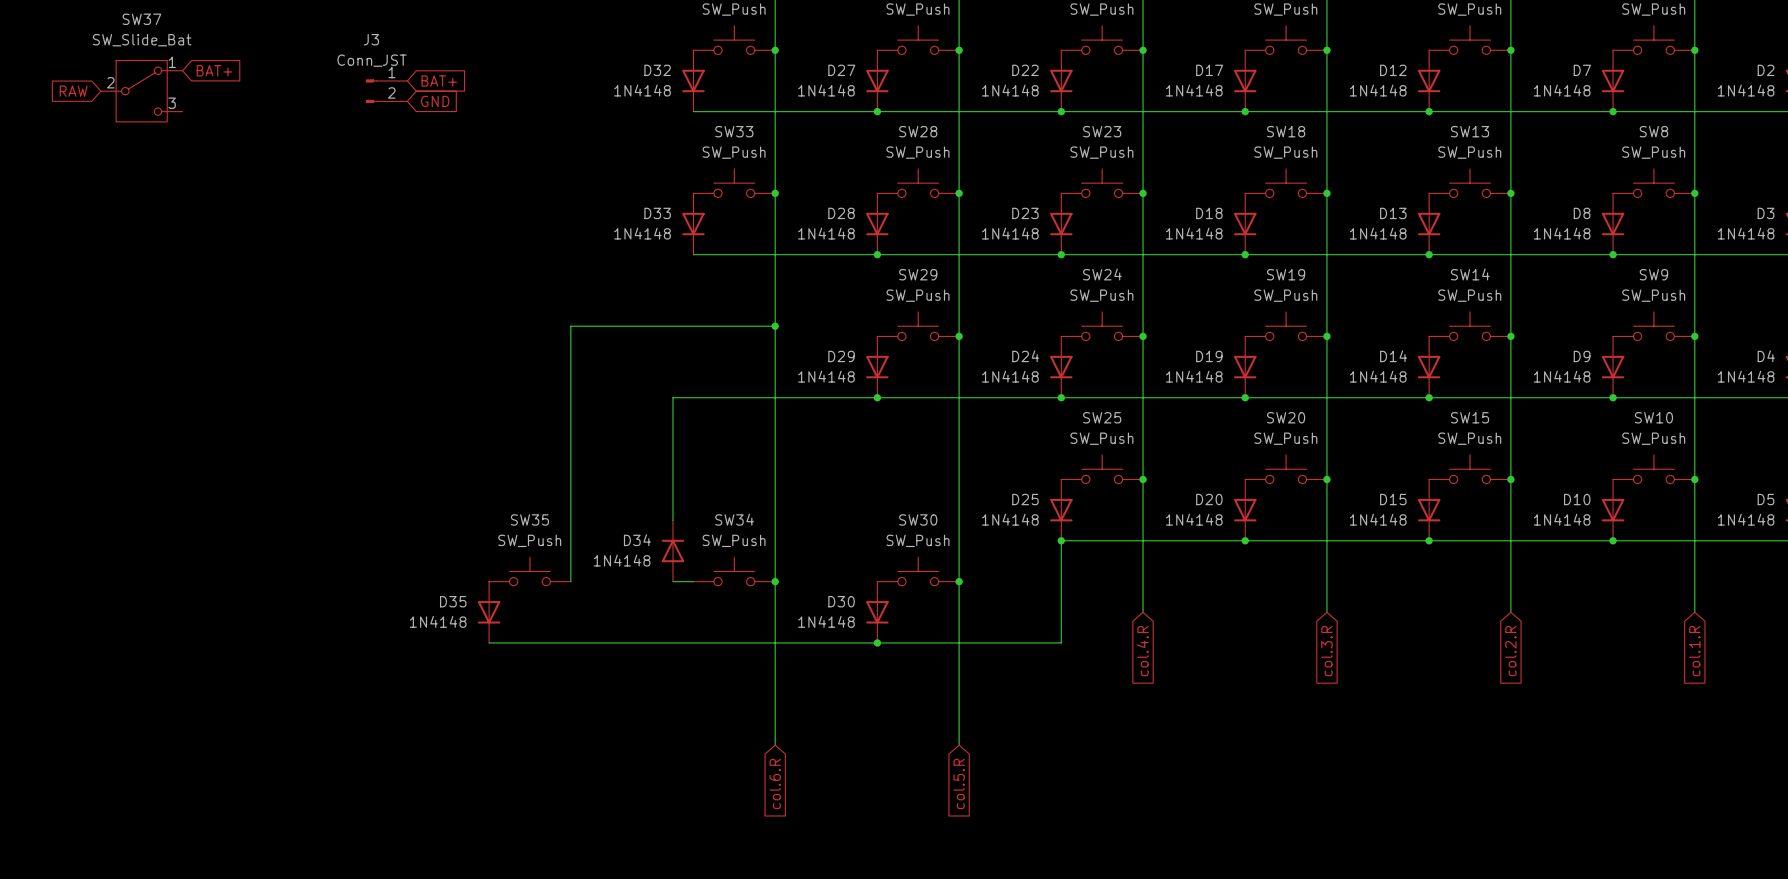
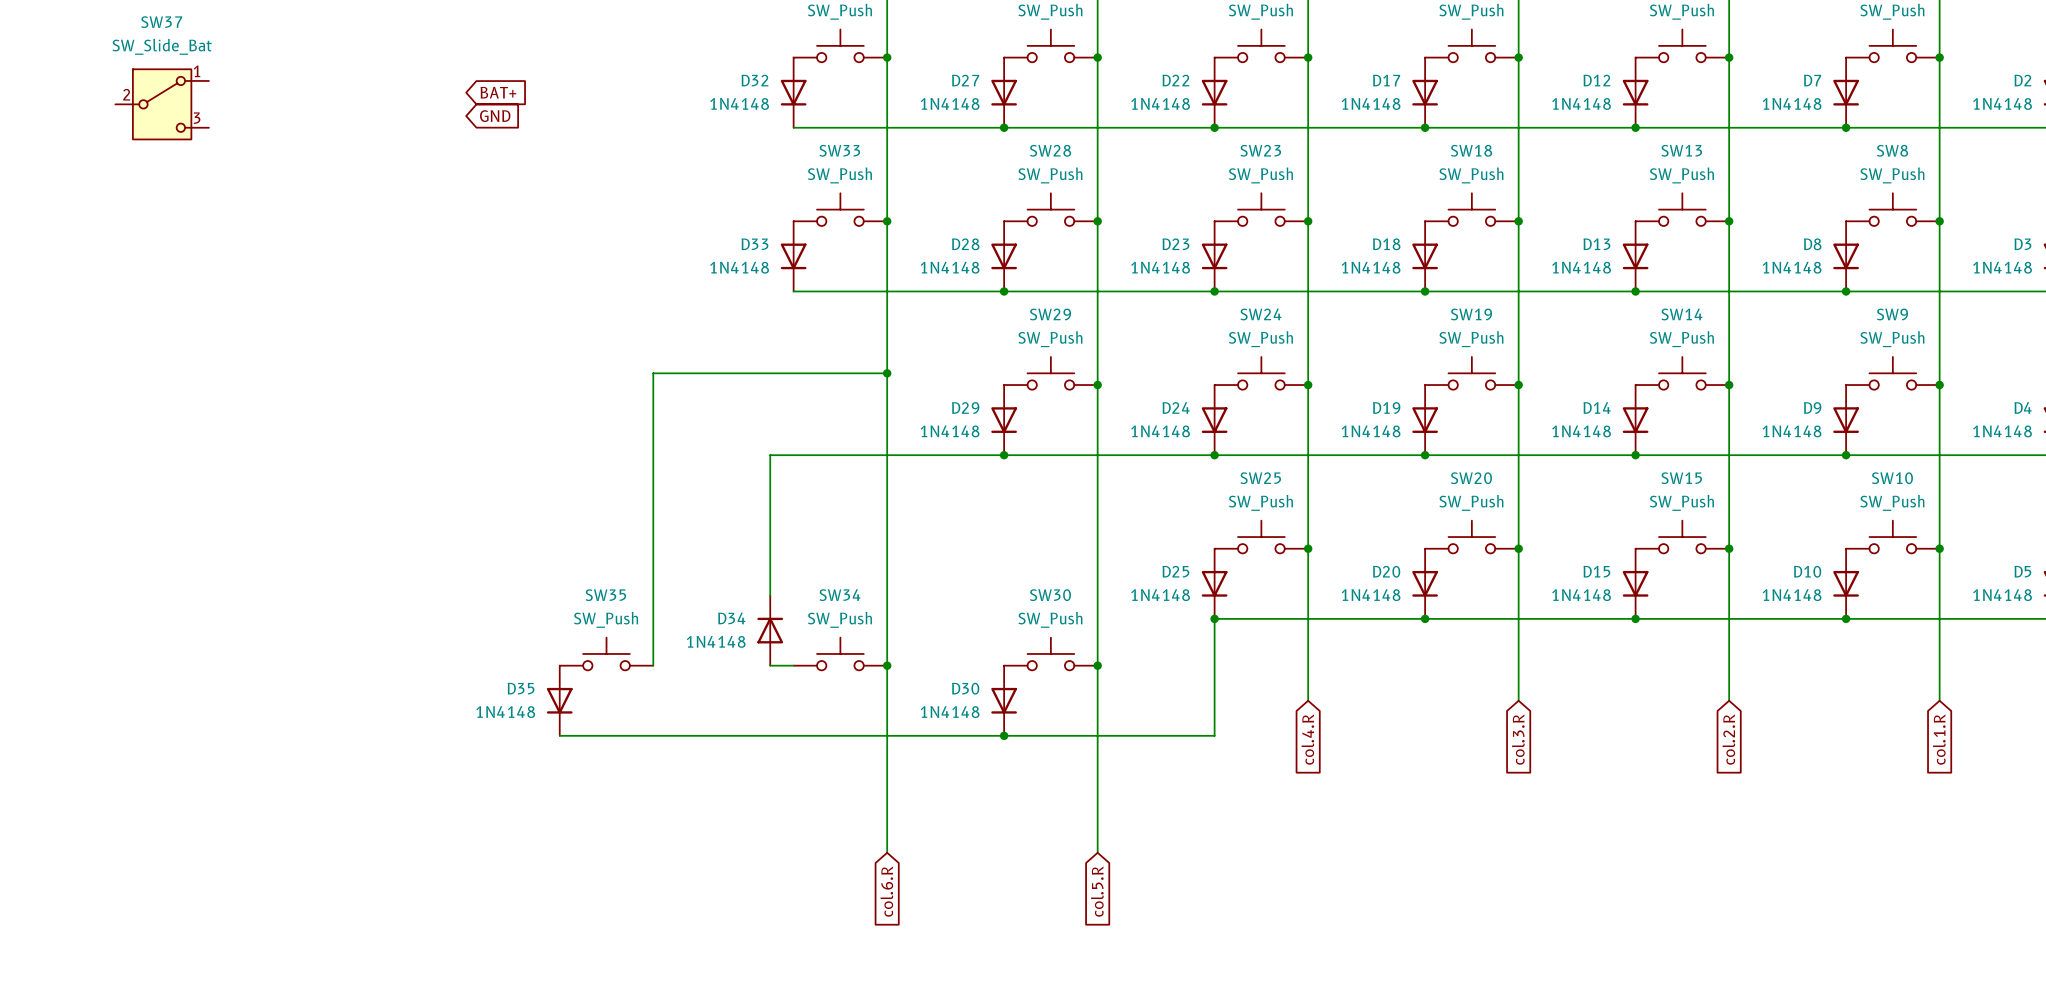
global label: BAT+ (214, 70) -> none
global label: RAW (73, 91) -> none
J3: Conn_JST (386, 91) -> none

